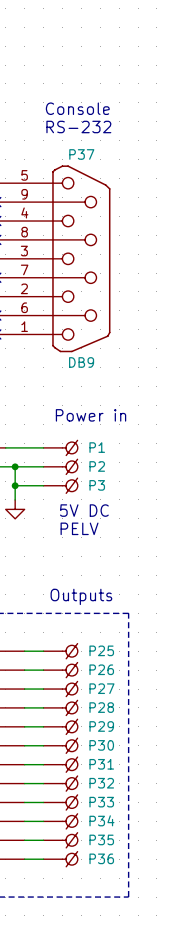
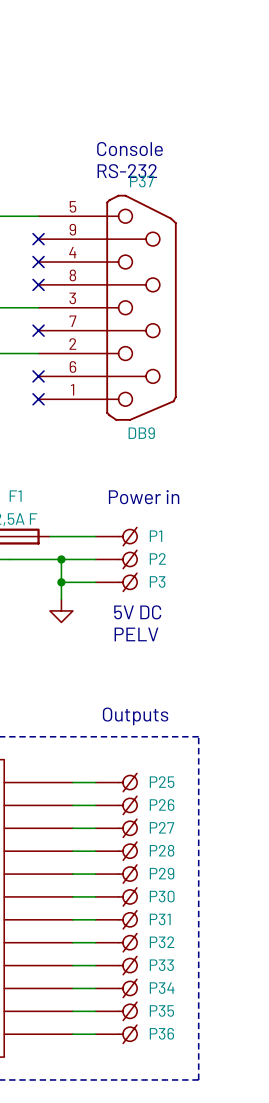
text: Console (77, 108) -> none
text: RS-232 (78, 126) -> Console (129, 149)
text: none -> RS-232 (127, 171)

